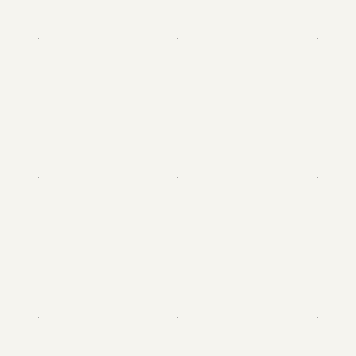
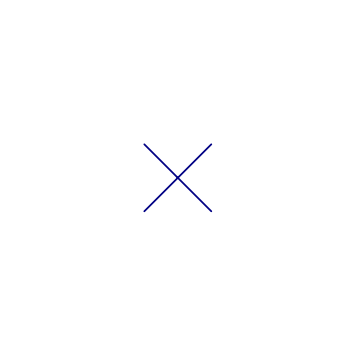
no-connect mark: none -> (177, 177)

